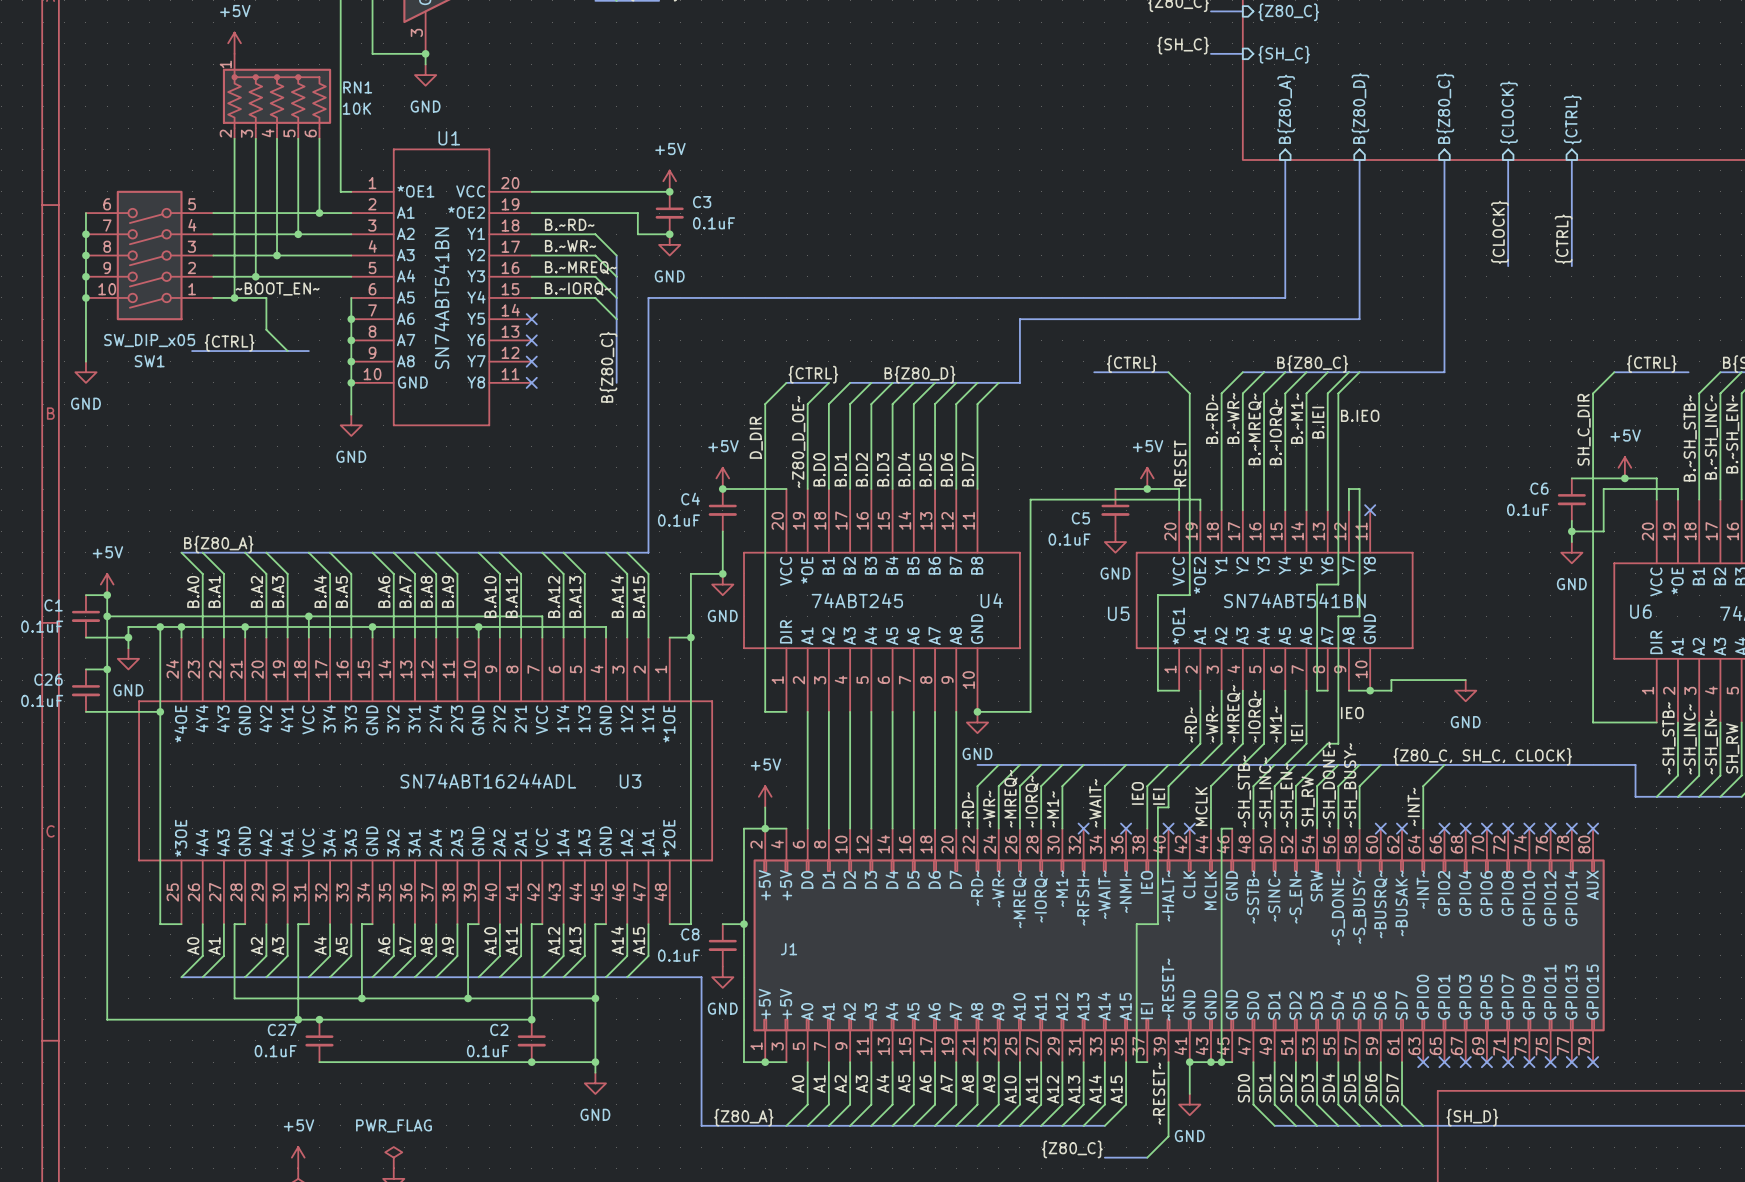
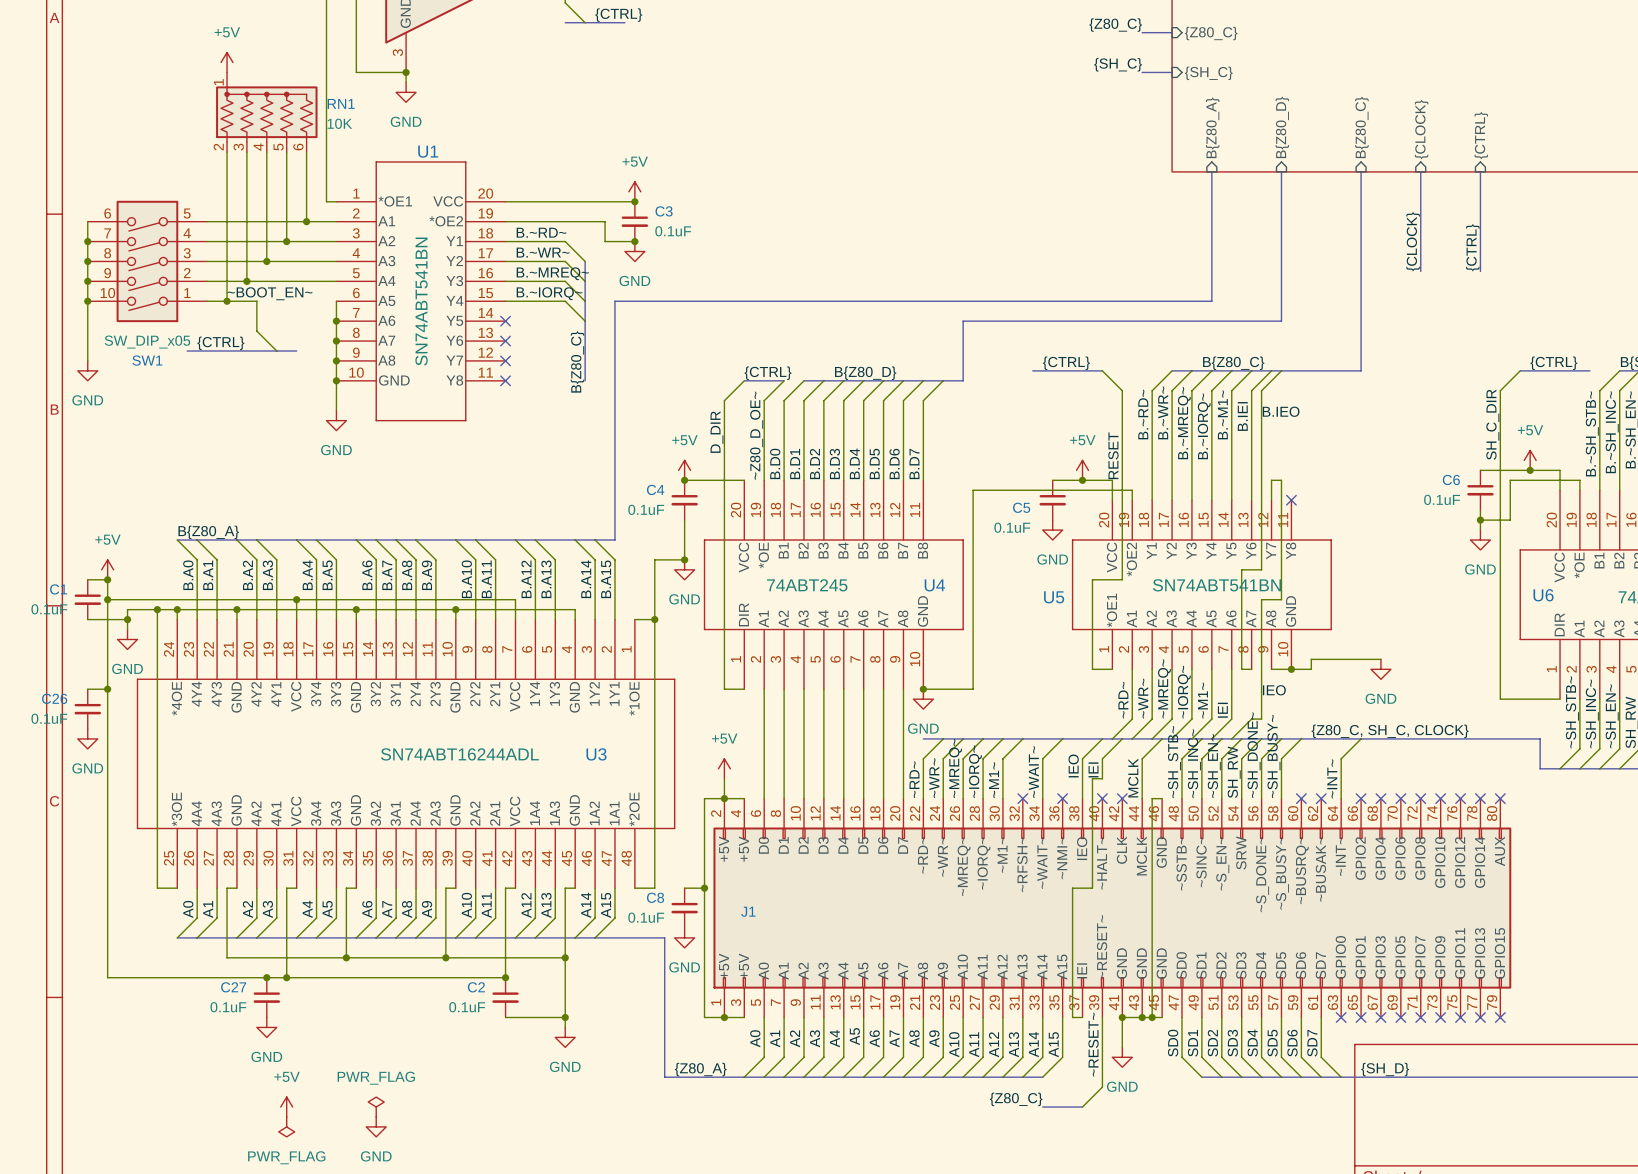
wire: (85, 669) (107, 669) -> none
junction: (107, 669) -> none
C26 position: (85, 690) -> (87, 709)
wire: (107, 711) (160, 711) -> none
junction: none -> (107, 689)
junction: (160, 711) -> none
power symbol: none -> GND (87, 738)
junction position: (319, 1019) -> (266, 977)
C27 position: (319, 1040) -> (266, 997)
wire: (319, 1062) (531, 1062) -> none
junction: (531, 1062) -> none
power symbol: none -> GND (266, 1027)

